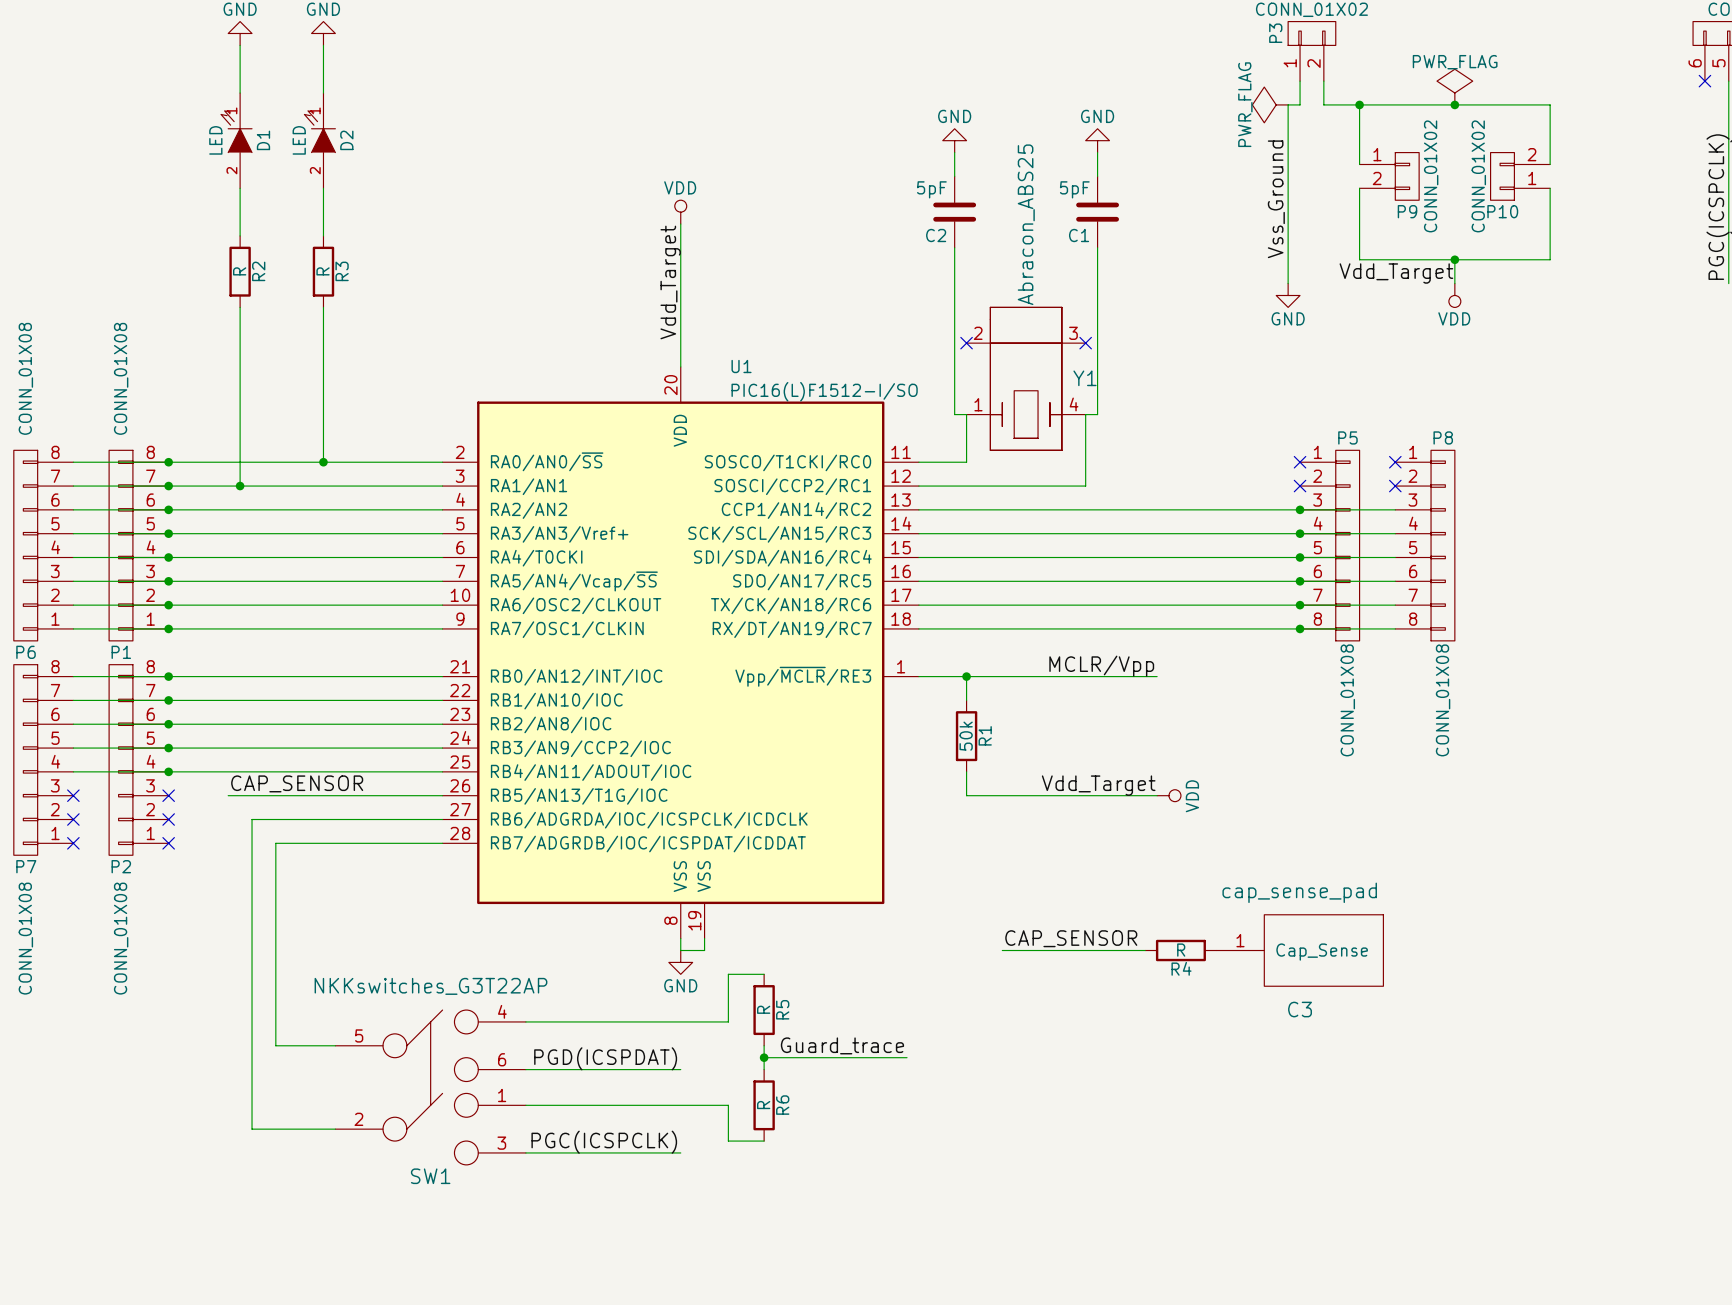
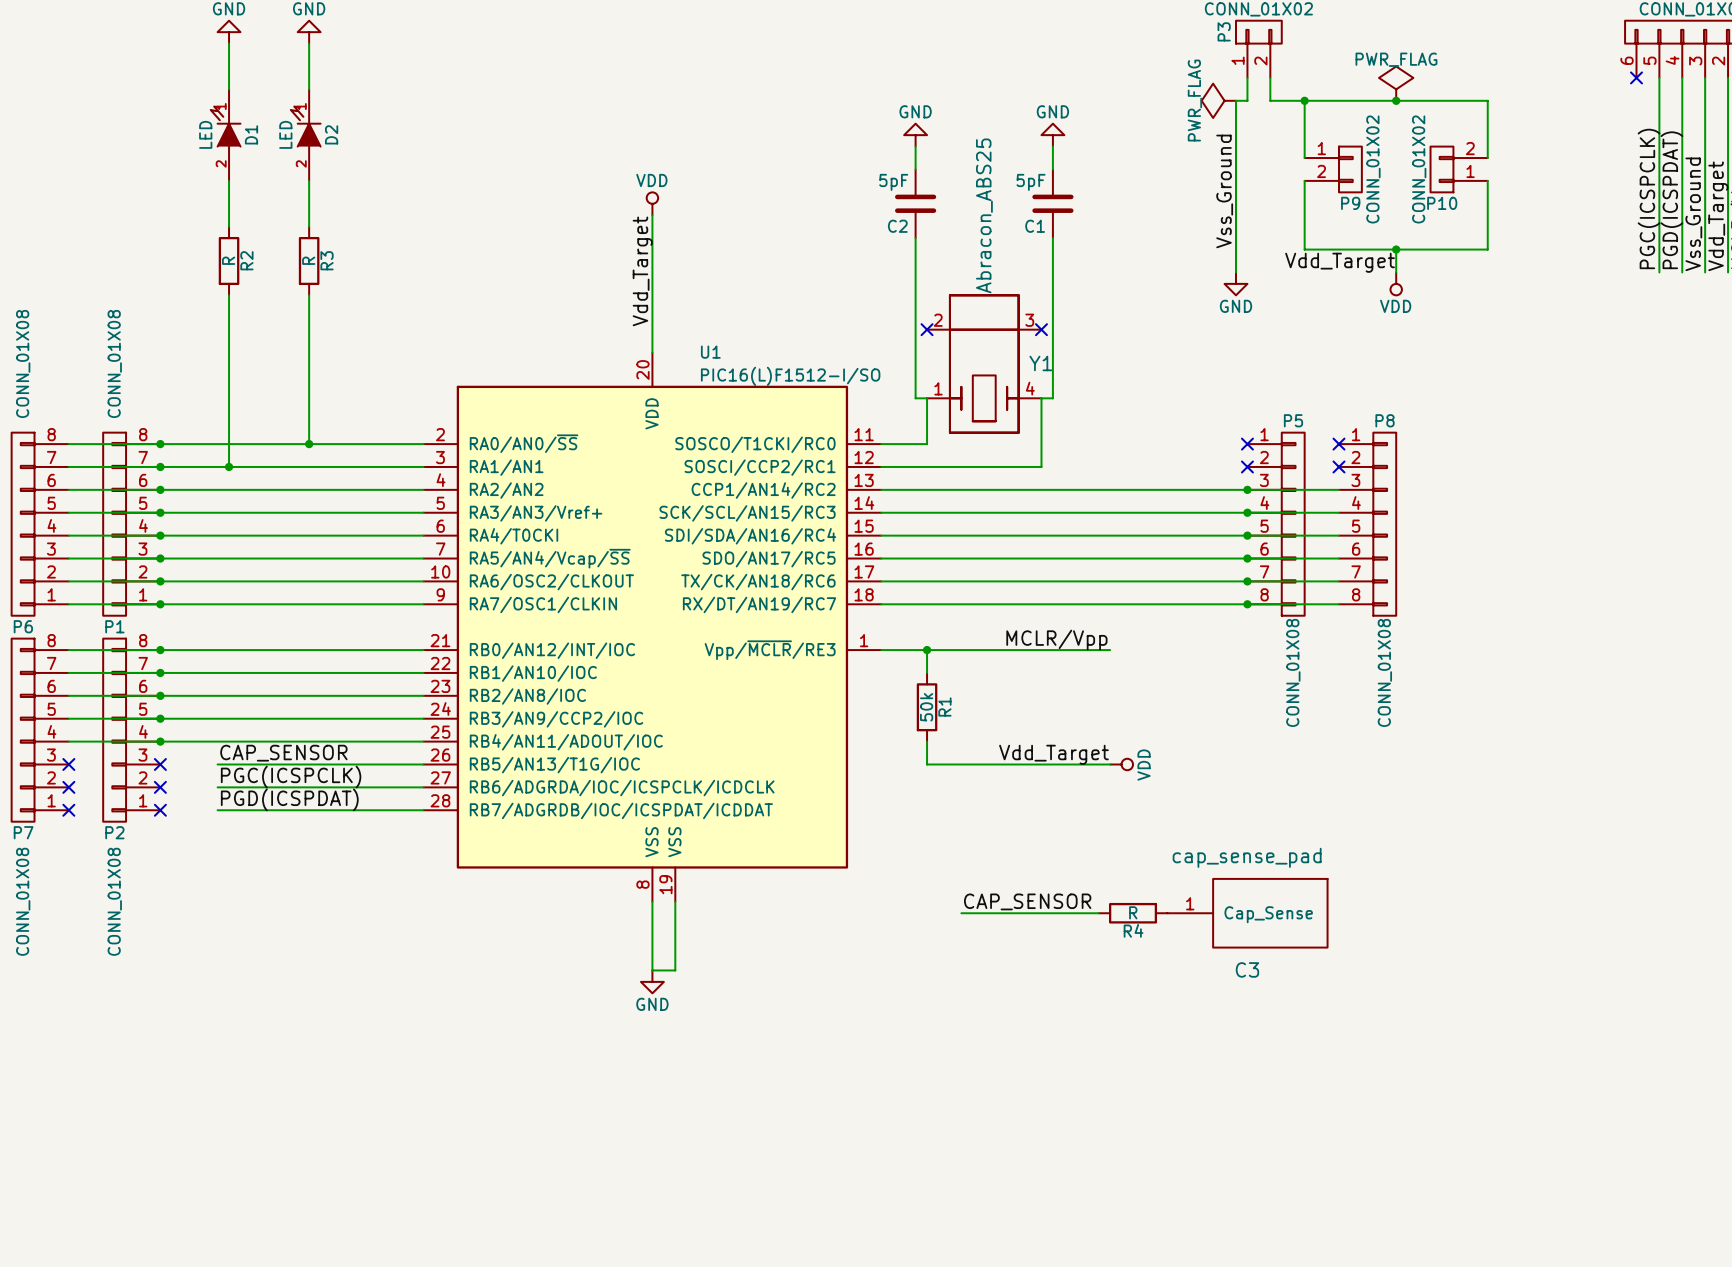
label: none -> PGC(ICSPCLK) (291, 777)
wire: (252, 819) (252, 1129) (335, 1129) -> (240, 787) (217, 787)
label: none -> PGD(ICSPDAT) (289, 799)
wire: (275, 843) (275, 1045) (335, 1045) -> (263, 810) (217, 810)
wire: (680, 950) (704, 950) -> (652, 913) (652, 970) (675, 970) (675, 913)
power symbol position: GND (680, 962) -> GND (652, 981)
wire: (764, 974) (728, 974) (728, 1021) (525, 1021) -> none
R5: R (764, 1010) -> none
wire: (764, 1045) (764, 1069) -> none
label: Guard_trace (842, 1045) -> none
wire: (764, 1057) (907, 1057) -> none
junction: (764, 1057) -> none
label: PGD(ICSPDAT) (605, 1058) -> none
wire: (525, 1069) (680, 1069) -> none
SW1: NKKswitches_G3T22AP (430, 1087) -> none
wire: (525, 1105) (728, 1105) (728, 1141) (764, 1141) -> none
R6: R (764, 1105) -> none
label: PGC(ICSPCLK) (604, 1142) -> none
wire: (525, 1152) (680, 1152) -> none

